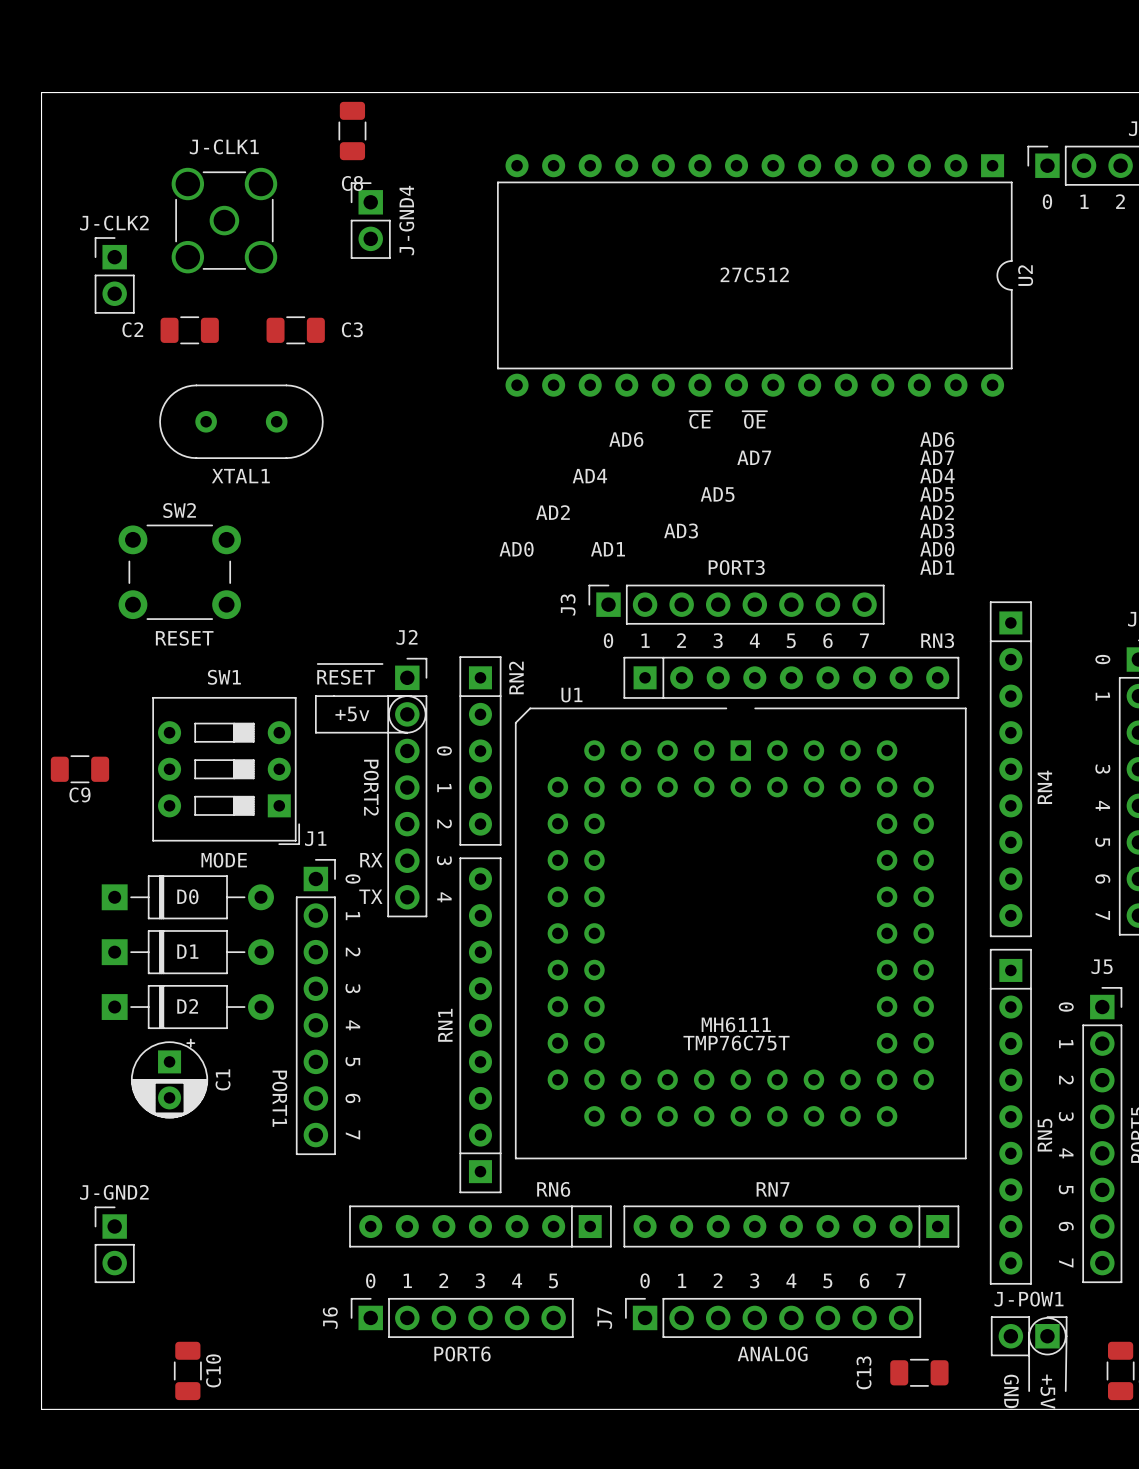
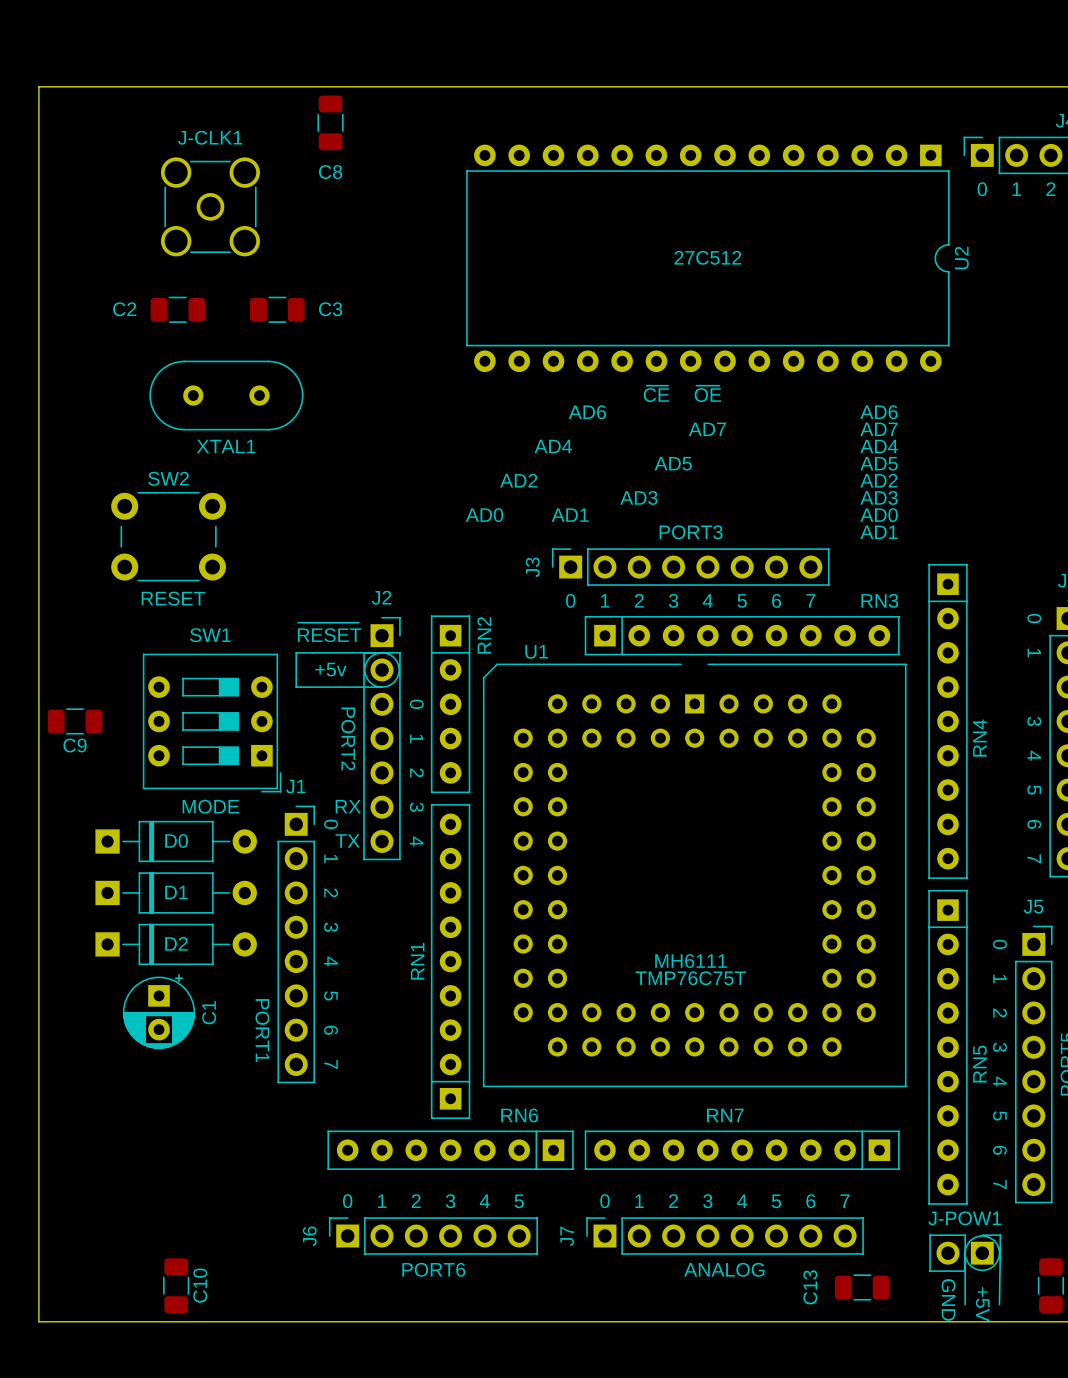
J-GND4: (370, 220) -> none
J-CLK2: (114, 275) -> none
J-GND2: (114, 1244) -> none

